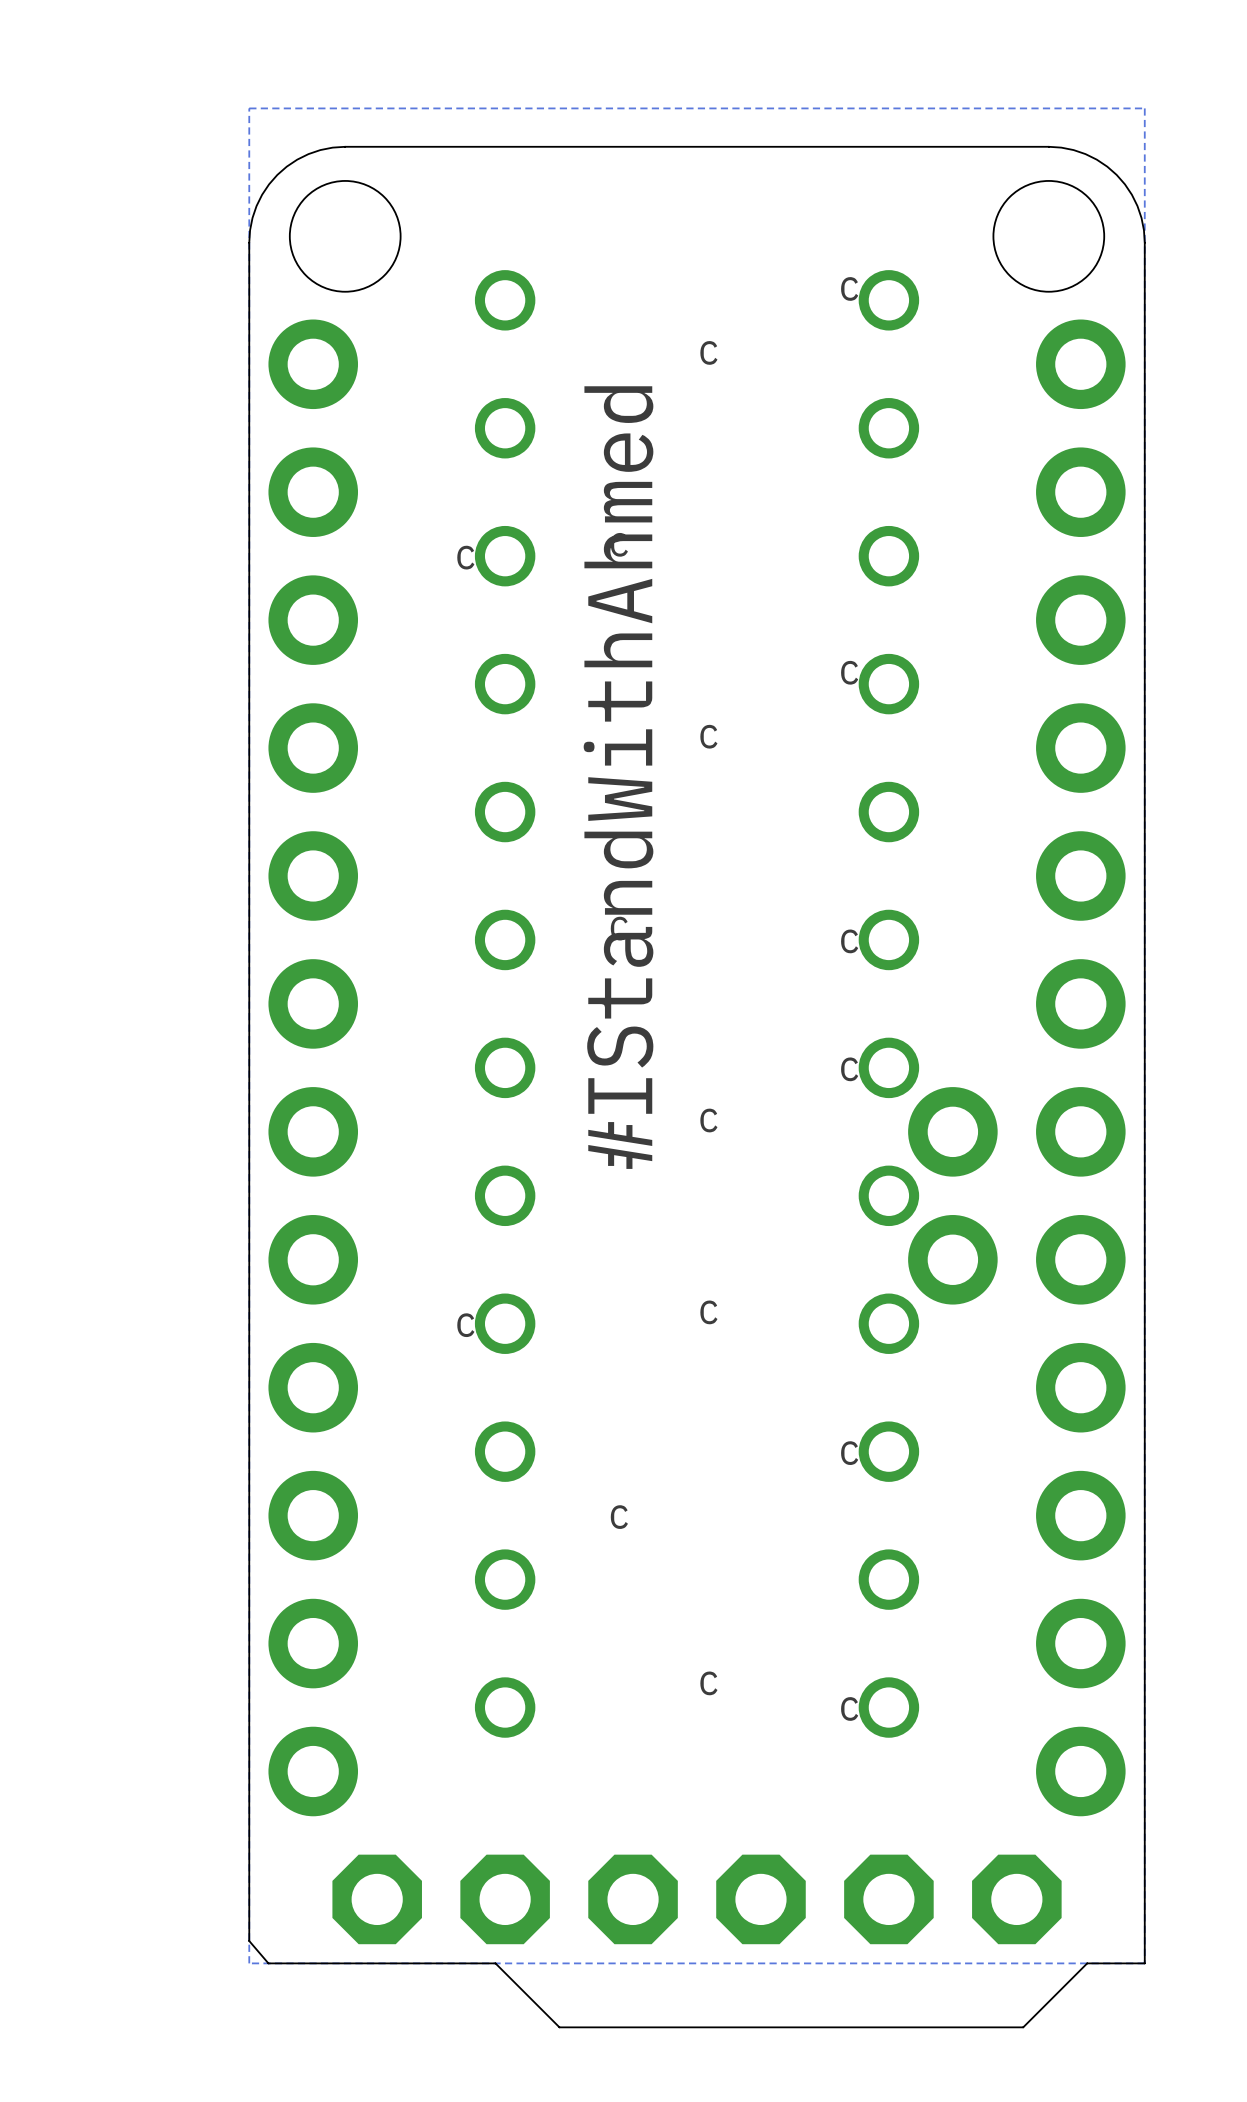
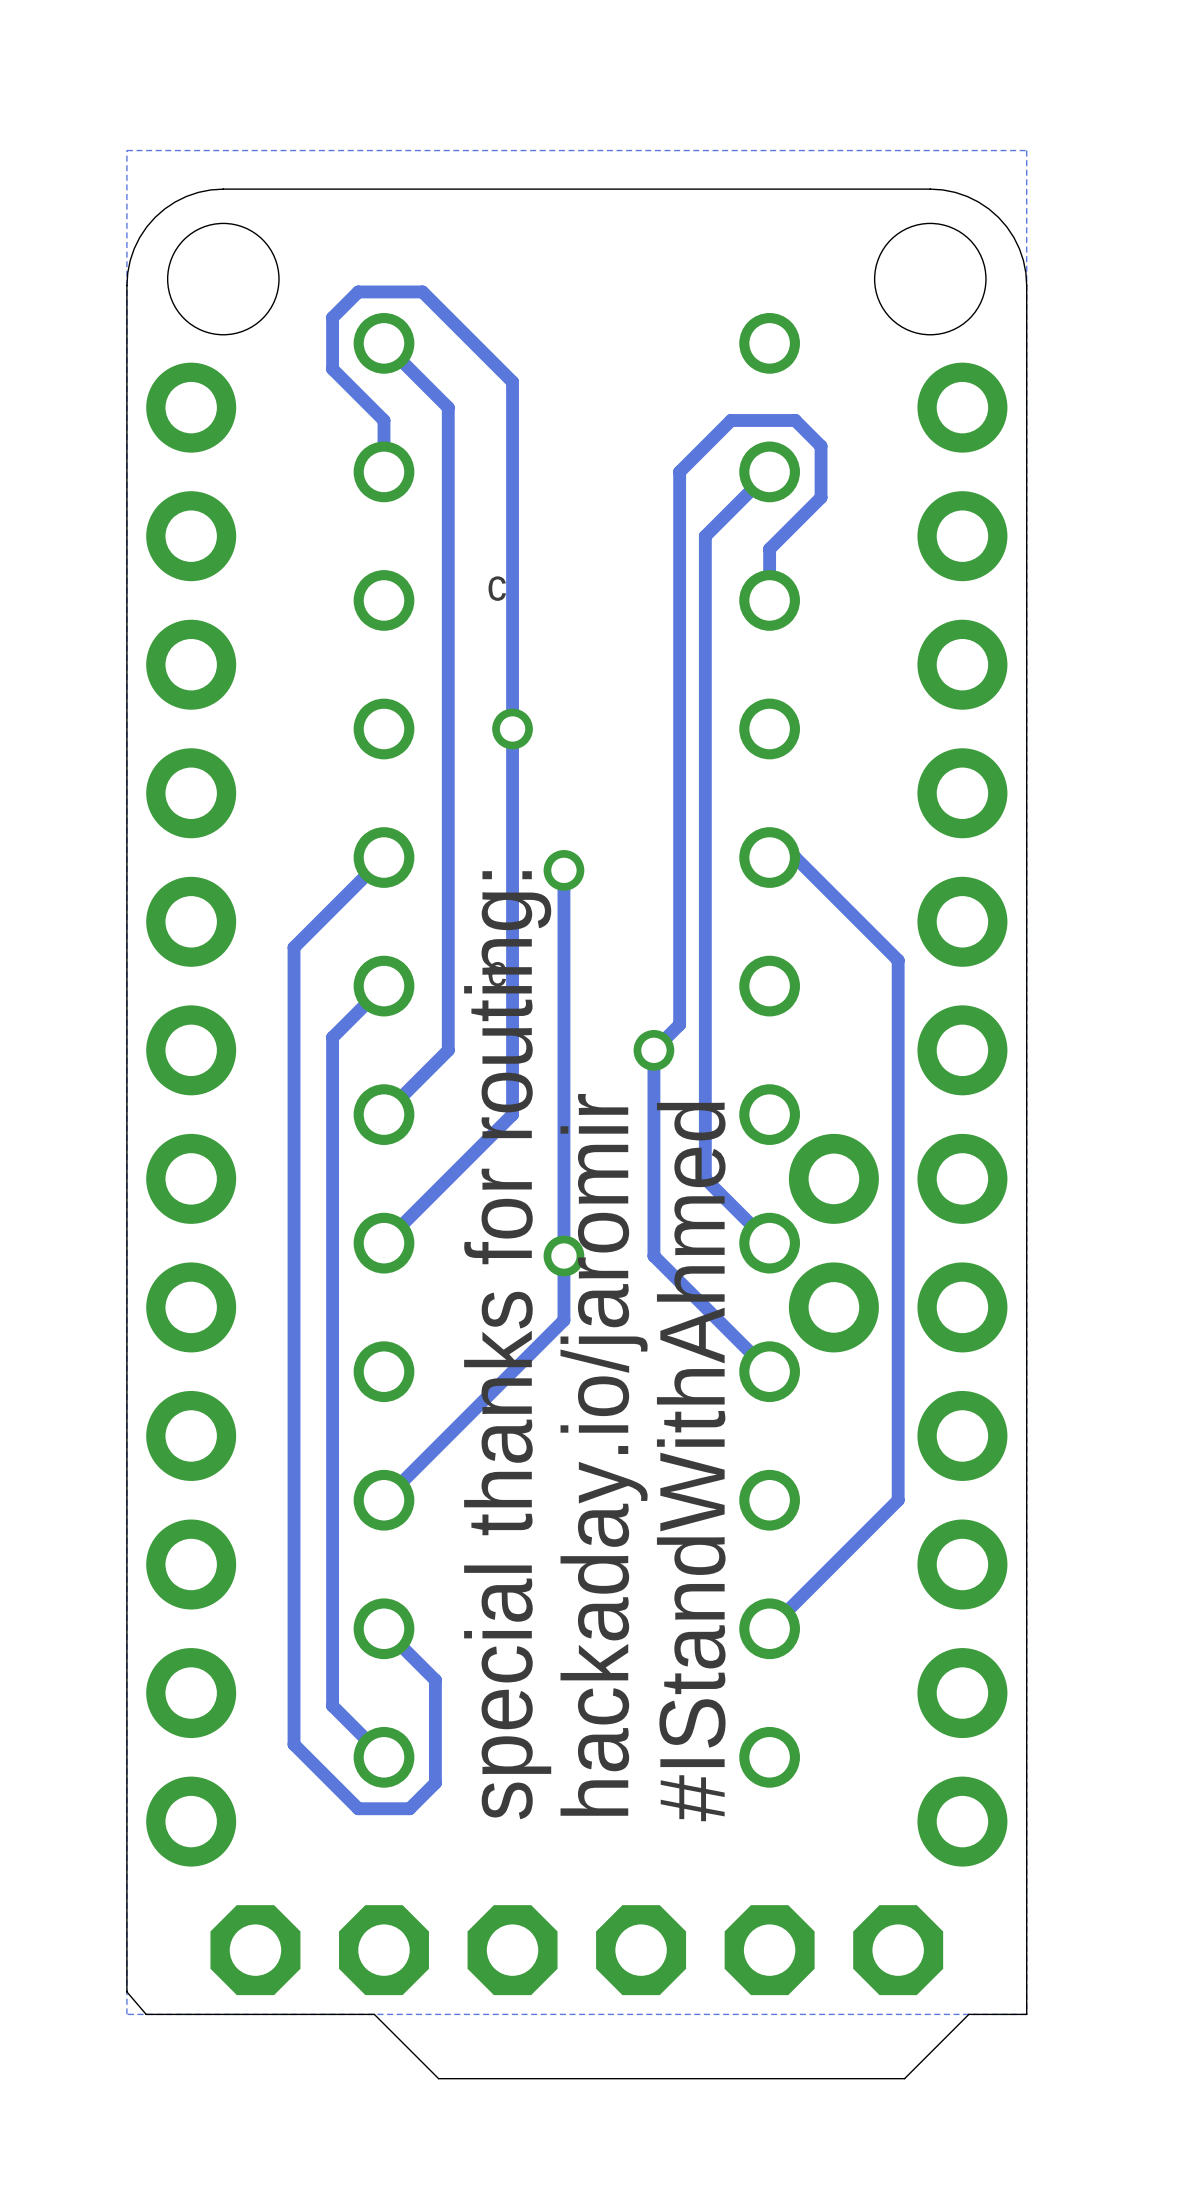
text: c (849, 288) -> none
track: none -> (383, 343) (448, 407) (448, 1050) (383, 1114)
text: c (708, 352) -> none
track: none -> (383, 471) (383, 420) (332, 369) (332, 317) (358, 291) (422, 291) (512, 381) (512, 1114) (383, 1243)
track: none -> (769, 471) (705, 536) (705, 1178) (769, 1243)
track: none -> (769, 600) (769, 549) (821, 497) (821, 446) (795, 420) (731, 420) (679, 471) (679, 1024) (653, 1050) (653, 1256) (769, 1371)
text: c (465, 557) -> none
text: c (849, 672) -> none
via: none -> (512, 728)
text: c (708, 736) -> none
text position: #IStandWithAhmed (618, 777) -> #IStandWithAhmed (691, 1461)
track: none -> (383, 857) (294, 947) (294, 1744) (358, 1808) (409, 1808) (435, 1783) (435, 1680) (383, 1628)
track: none -> (769, 857) (795, 857) (898, 960) (898, 1500) (769, 1628)
track: none -> (563, 870) (563, 1320) (383, 1500)
via: none -> (563, 870)
track: none -> (383, 986) (332, 1037) (332, 1705) (383, 1757)
text: c (849, 941) -> none
via: none -> (653, 1050)
text: c (849, 1069) -> none
text: none -> special thanks for routing: (507, 1345)
text: c (708, 1120) -> none
via: none -> (563, 1256)
text: none -> hackaday.io/jaromir (604, 1454)
text: c (708, 1312) -> none
text: c (465, 1325) -> none
text: c (849, 1453) -> none
text: c (619, 1517) -> none
text: c (708, 1683) -> none
text: c (849, 1708) -> none

